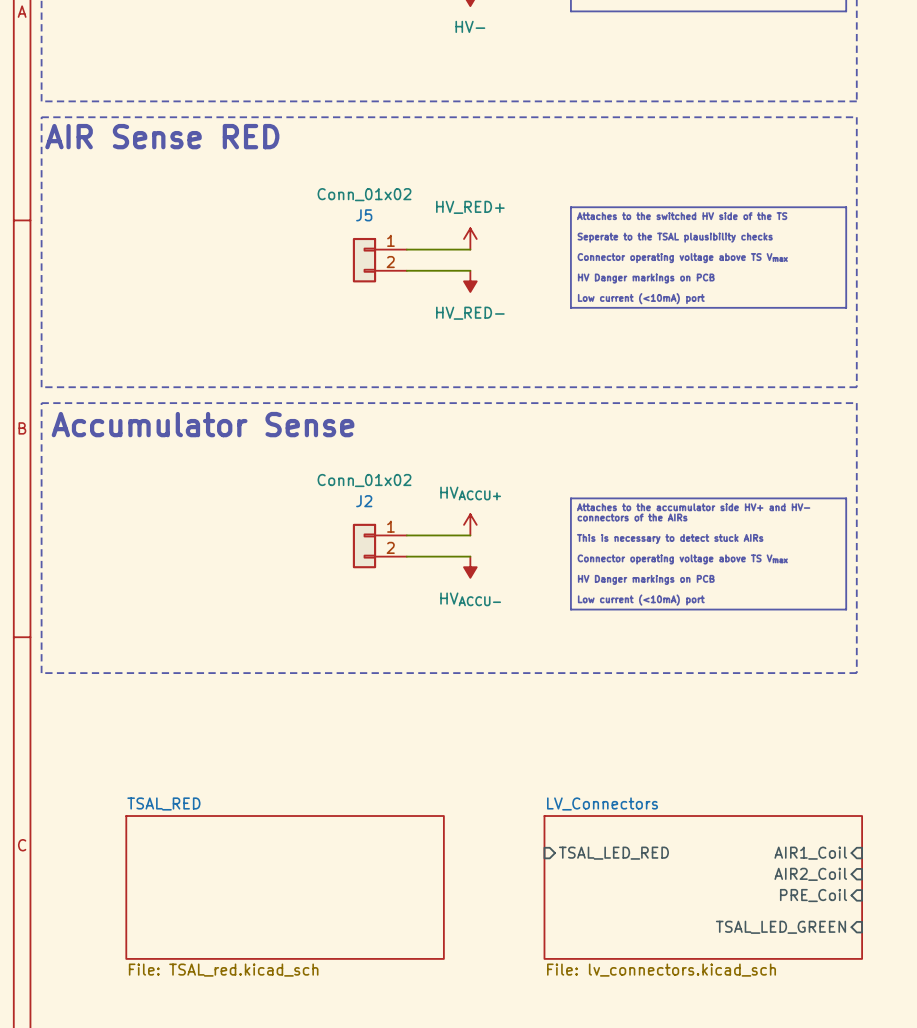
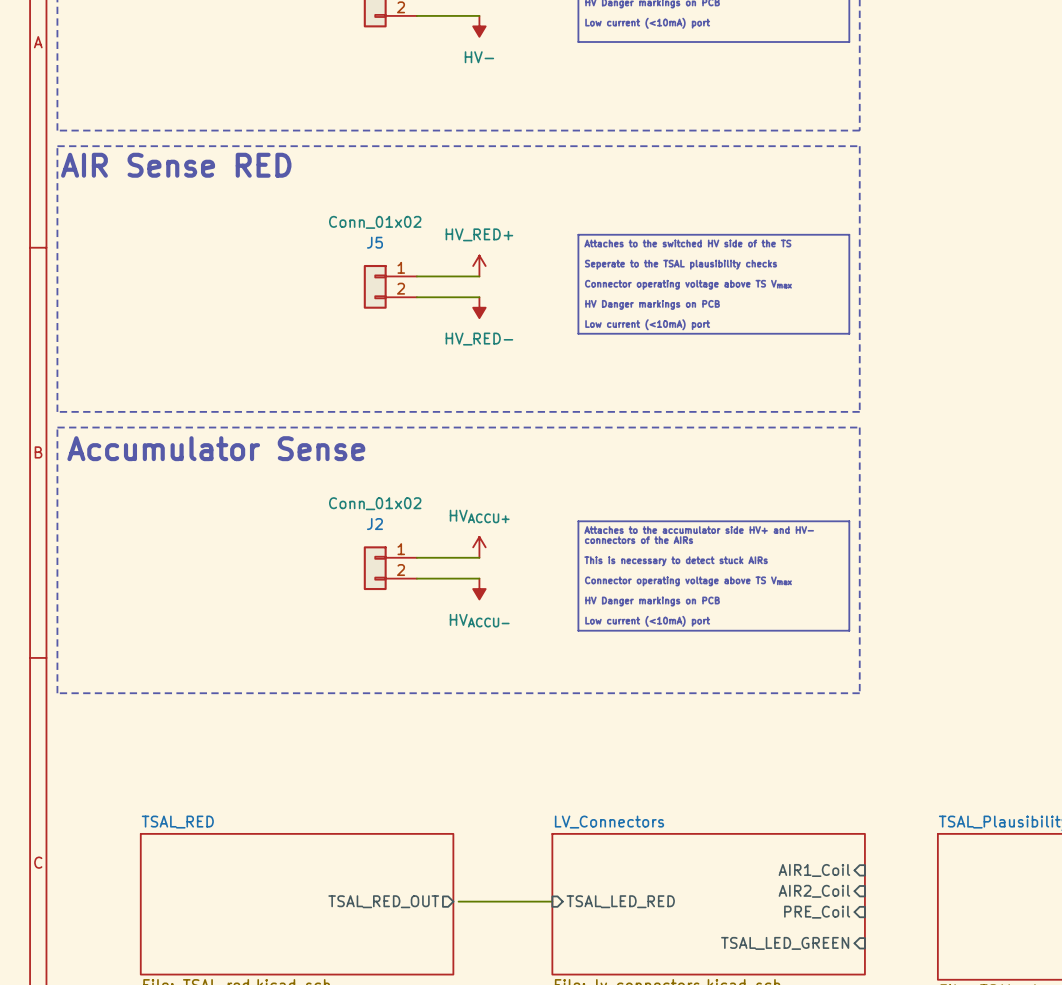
sheet pin position: TSAL_LED_RED (613, 853) -> TSAL_LED_RED (620, 901)
sheet pin: none -> TSAL_RED_OUT (383, 901)
wire: none -> (458, 901) (552, 901)

